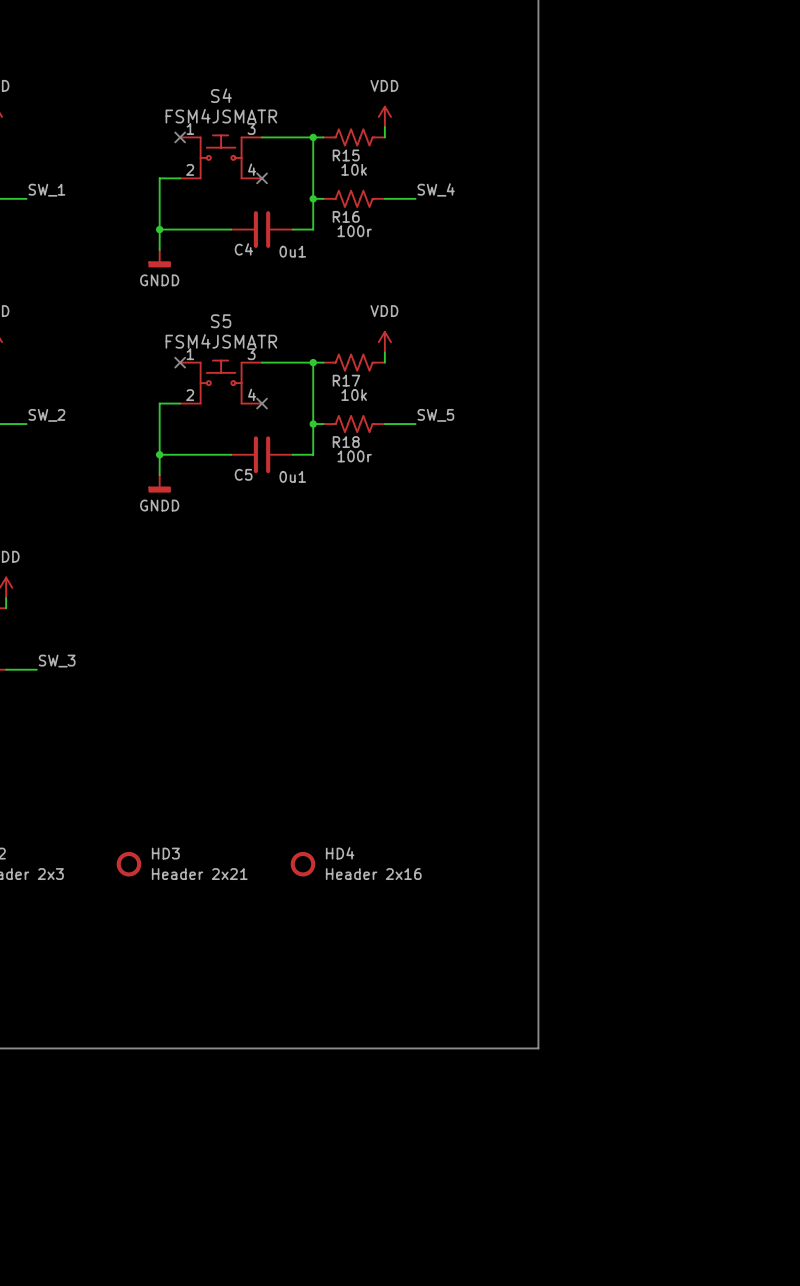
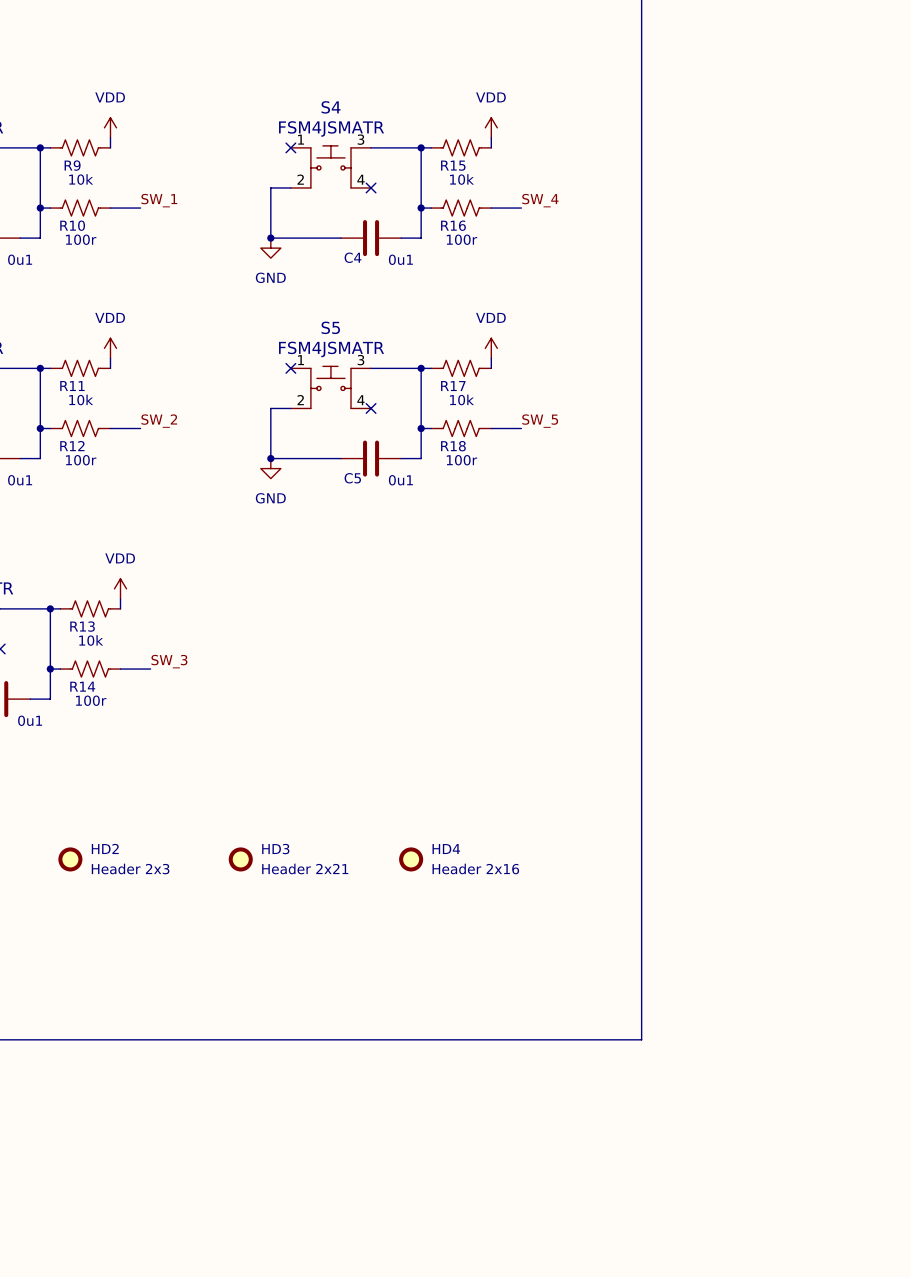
power symbol: none -> GND (270, 248)
power symbol: GNDD (159, 258) -> none
power symbol: none -> GND (270, 468)
power symbol: GNDD (159, 483) -> none

